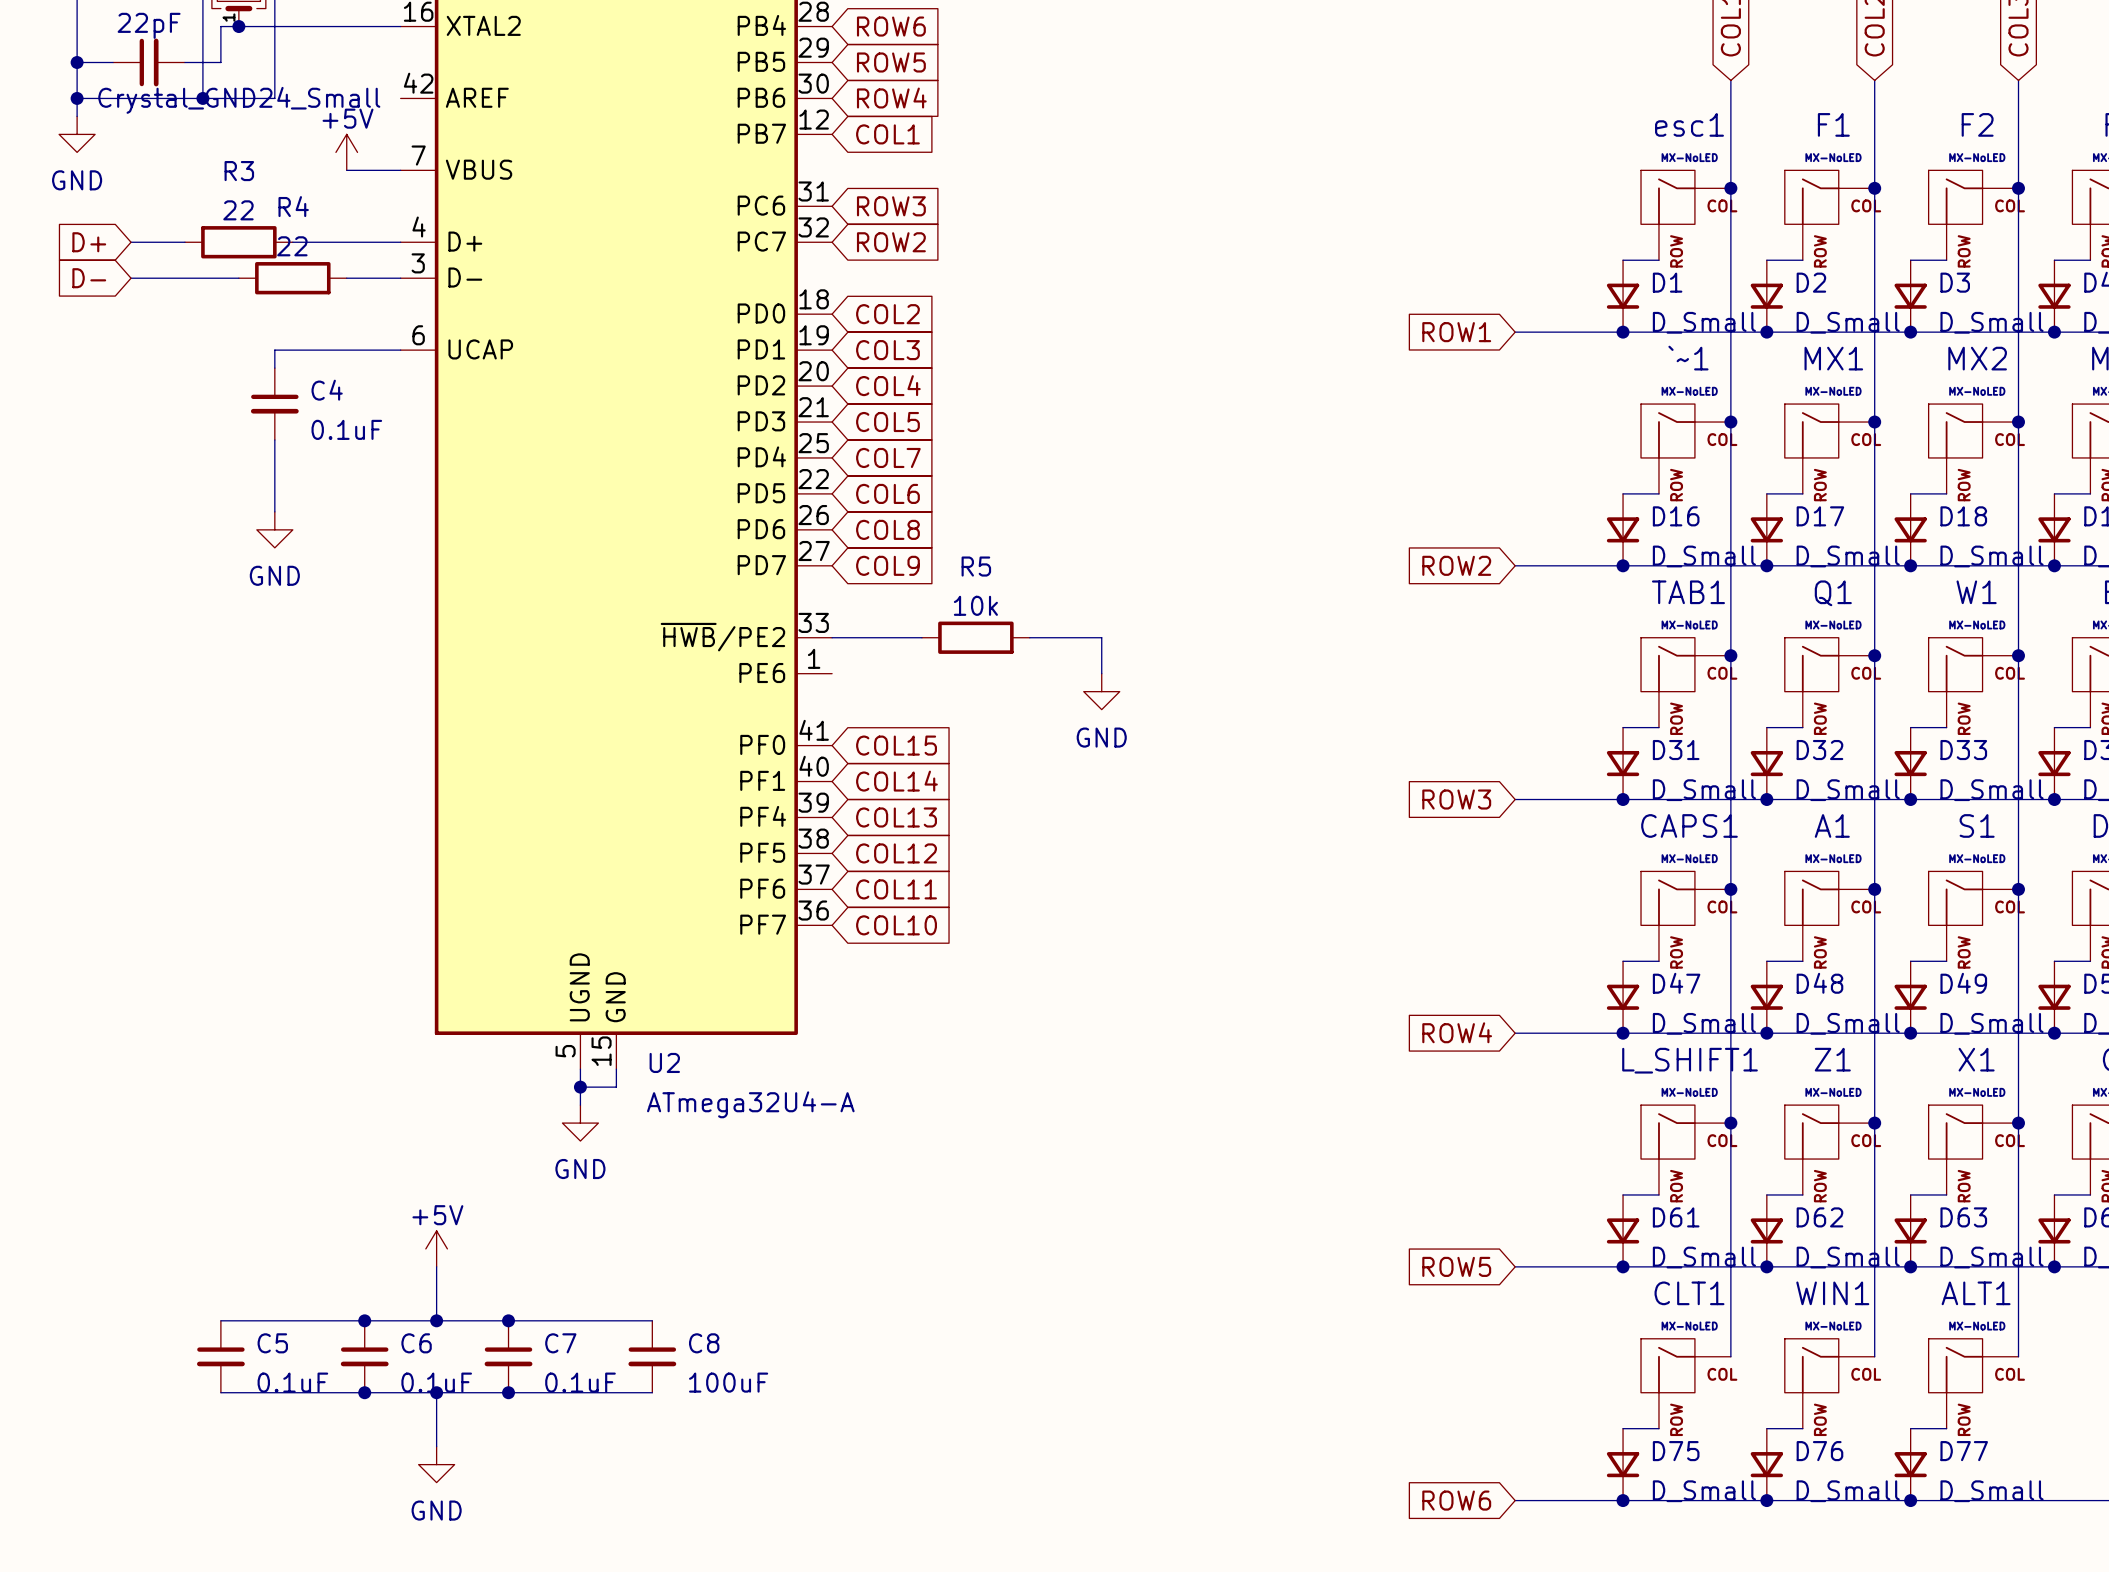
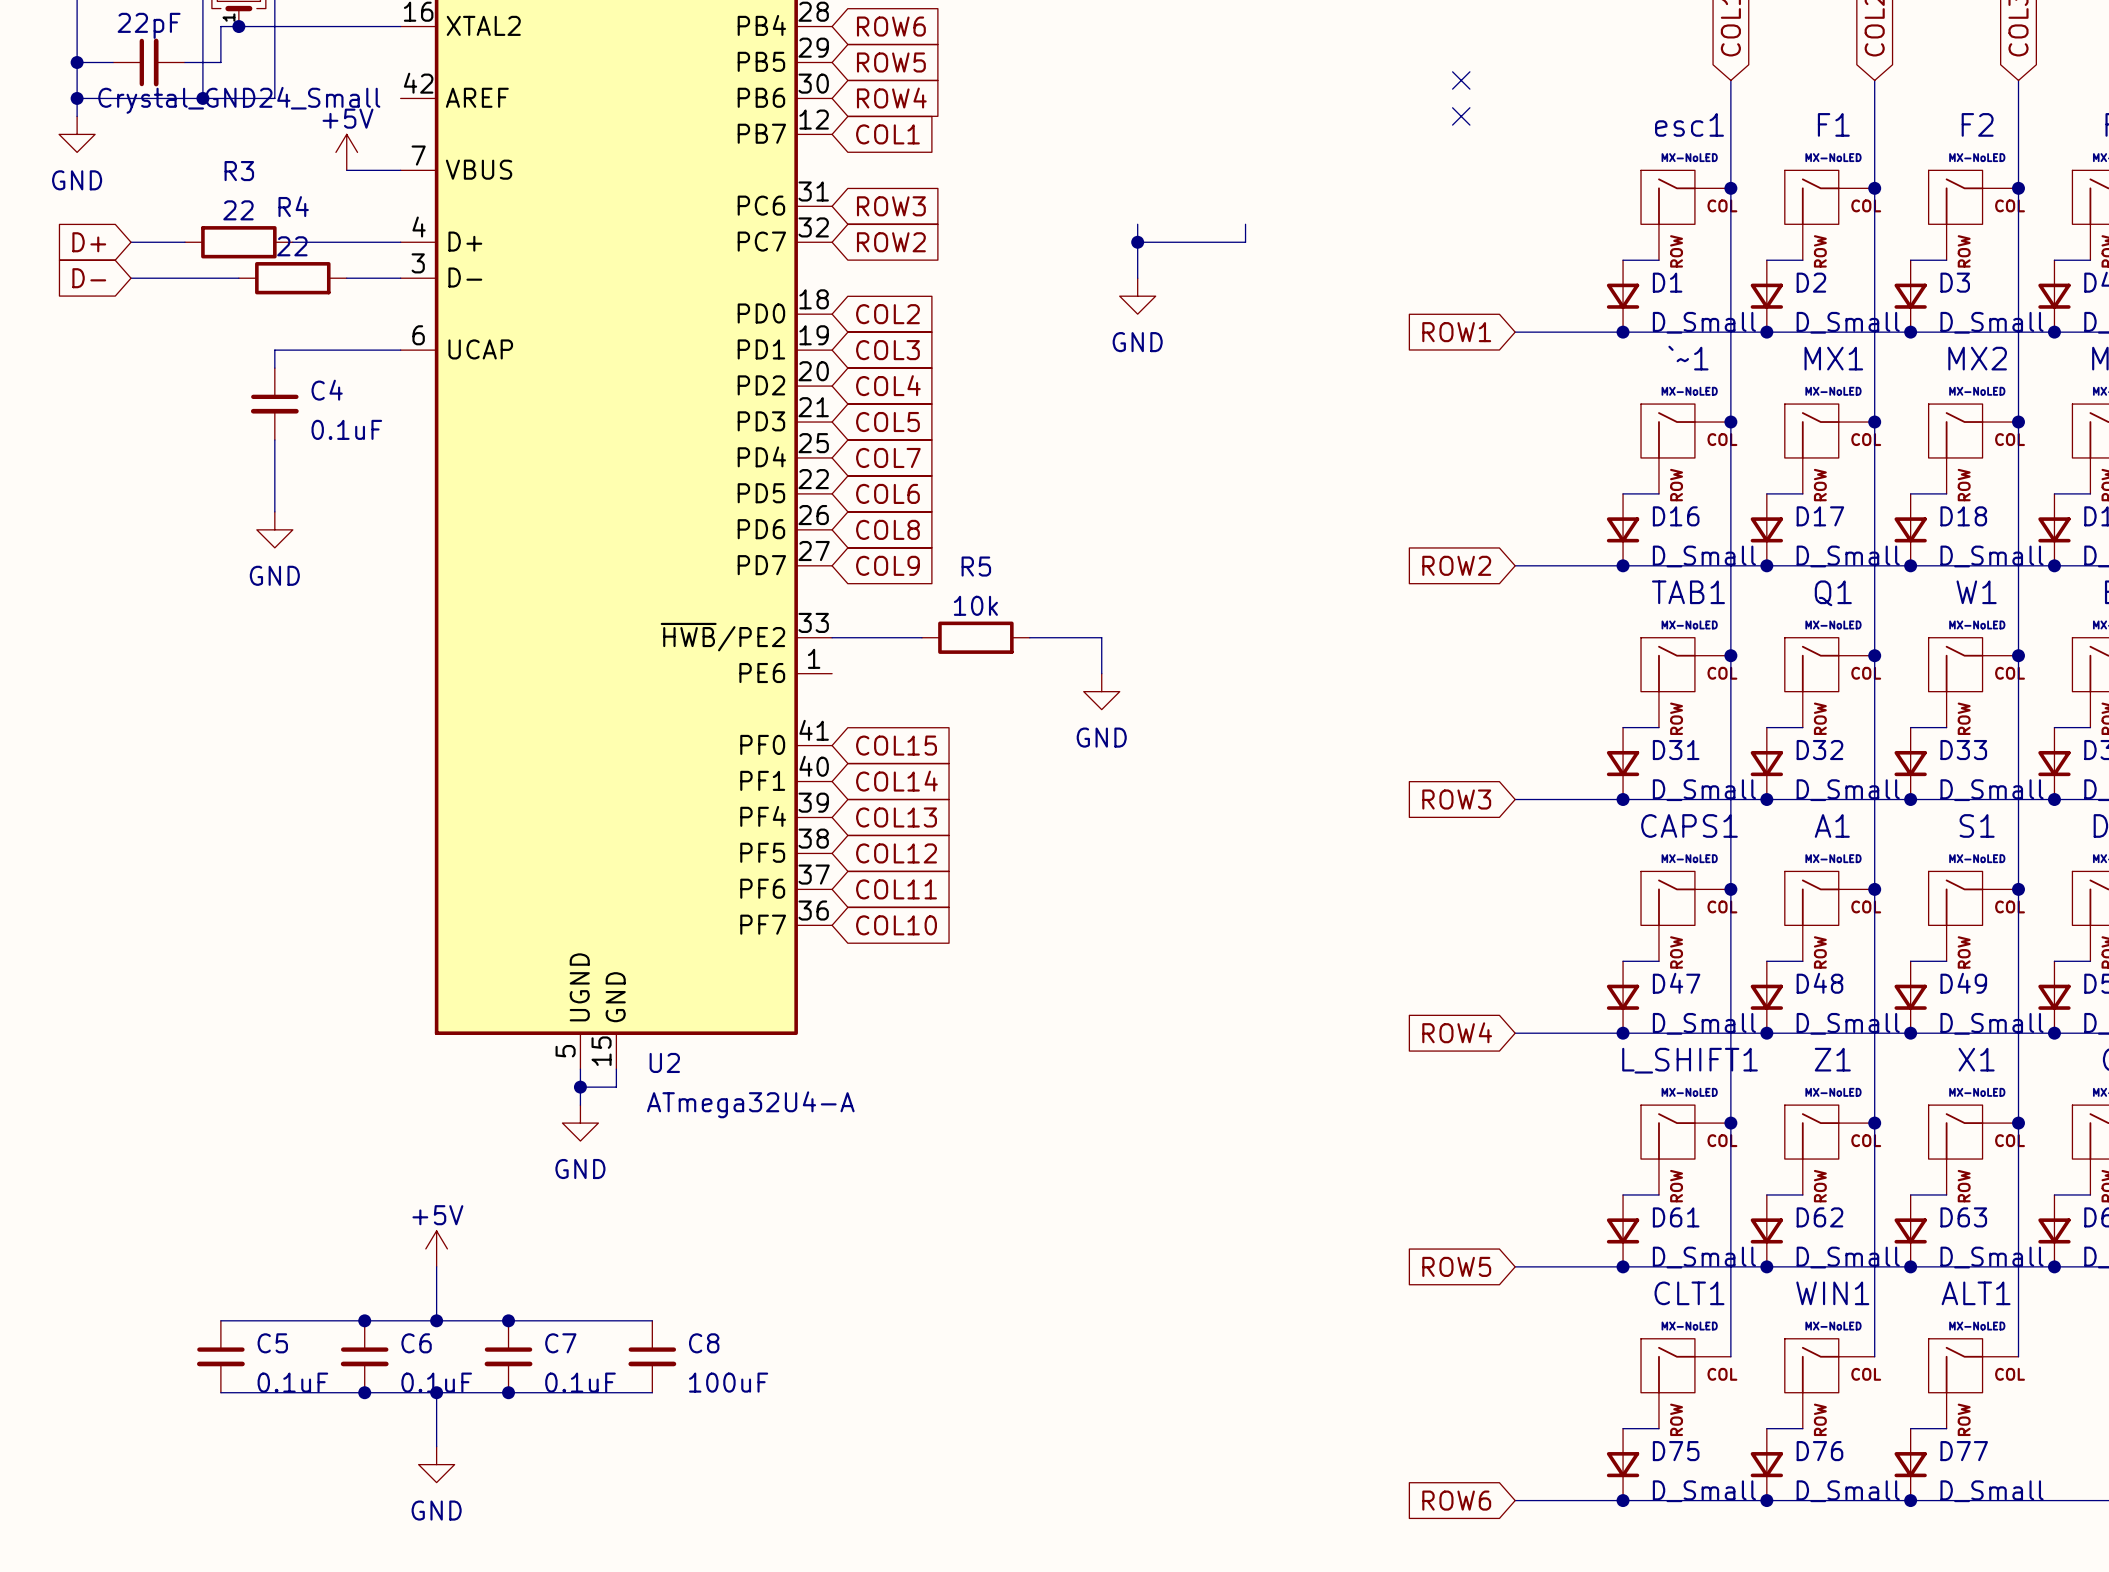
no-connect mark: none -> (1461, 80)
no-connect mark: none -> (1461, 116)
wire: none -> (1137, 224) (1137, 278)
wire: none -> (1245, 224) (1245, 242) (1137, 242)
junction: none -> (1137, 242)
power symbol: none -> GND (1137, 296)

